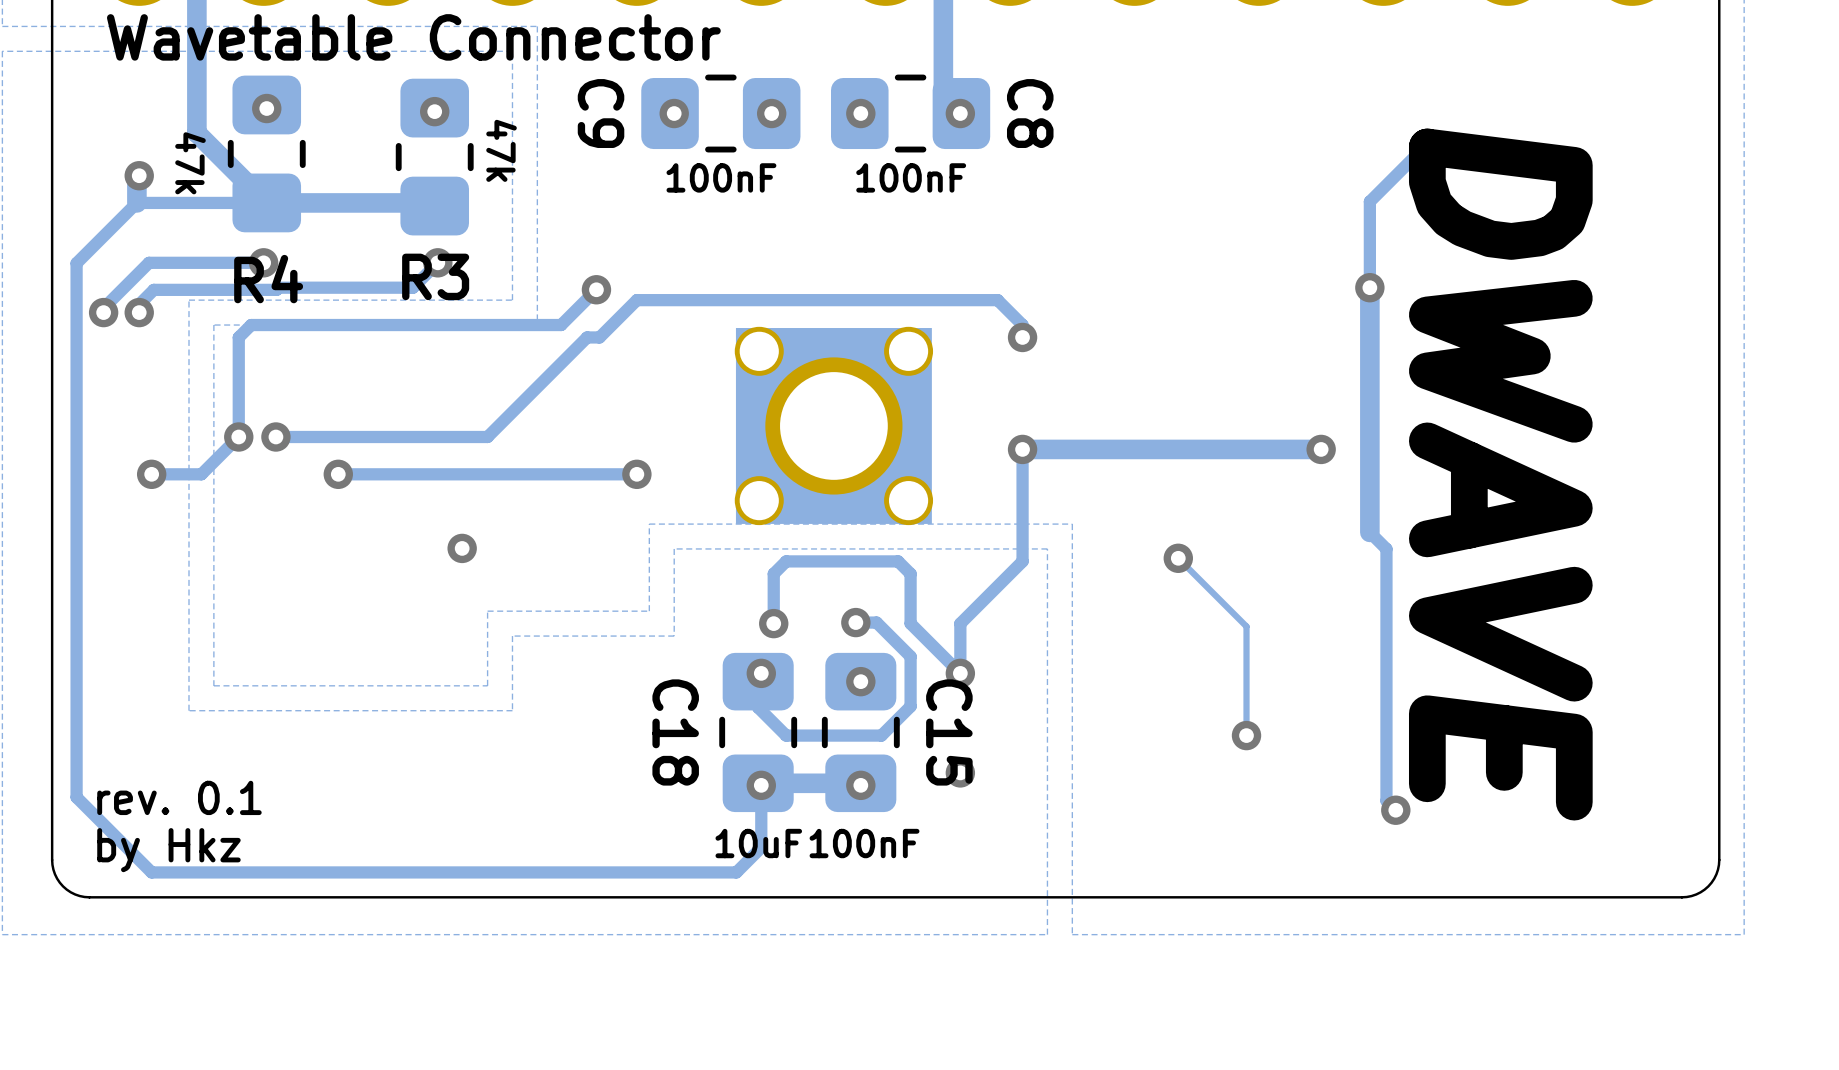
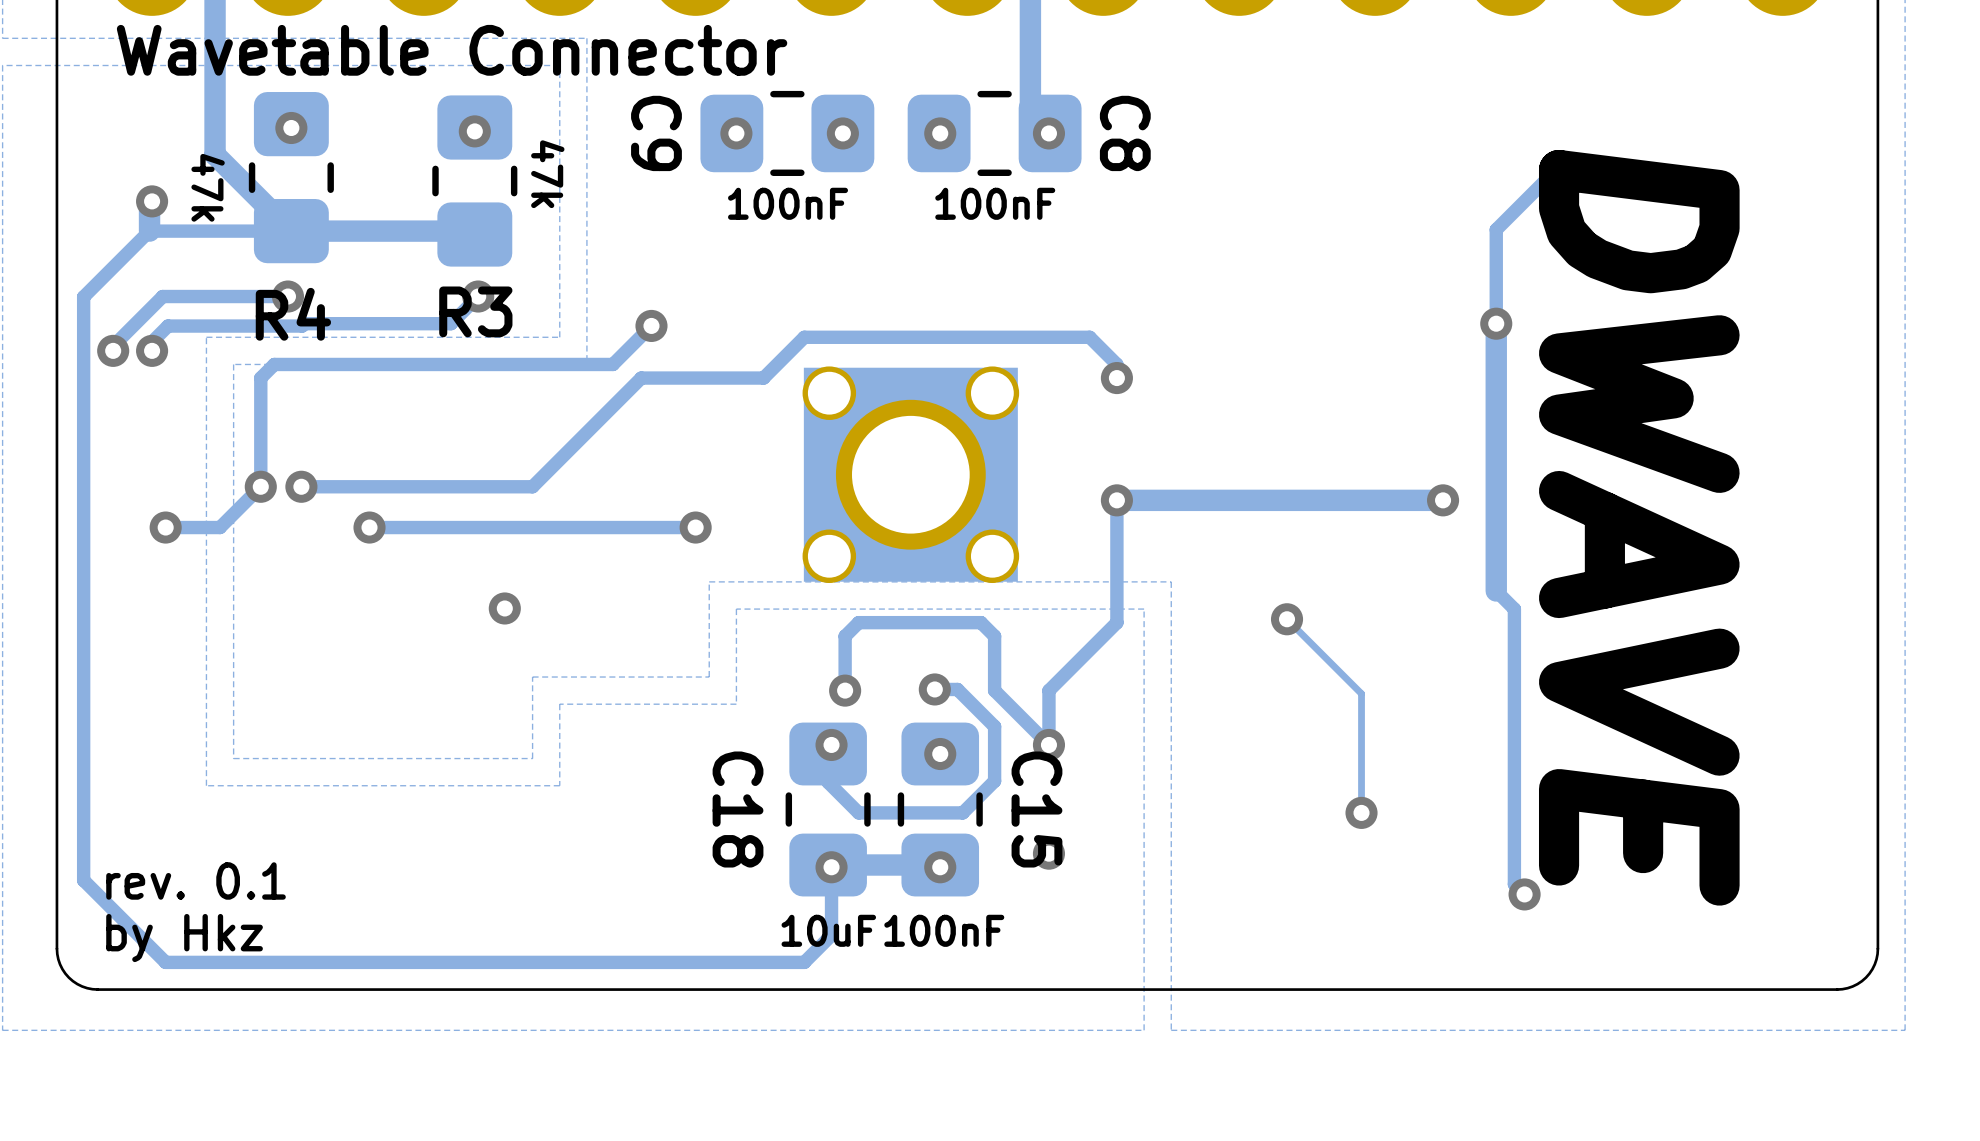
track: (736, 300) (636, 300) (599, 337) -> (804, 337) (763, 378) (654, 378)

